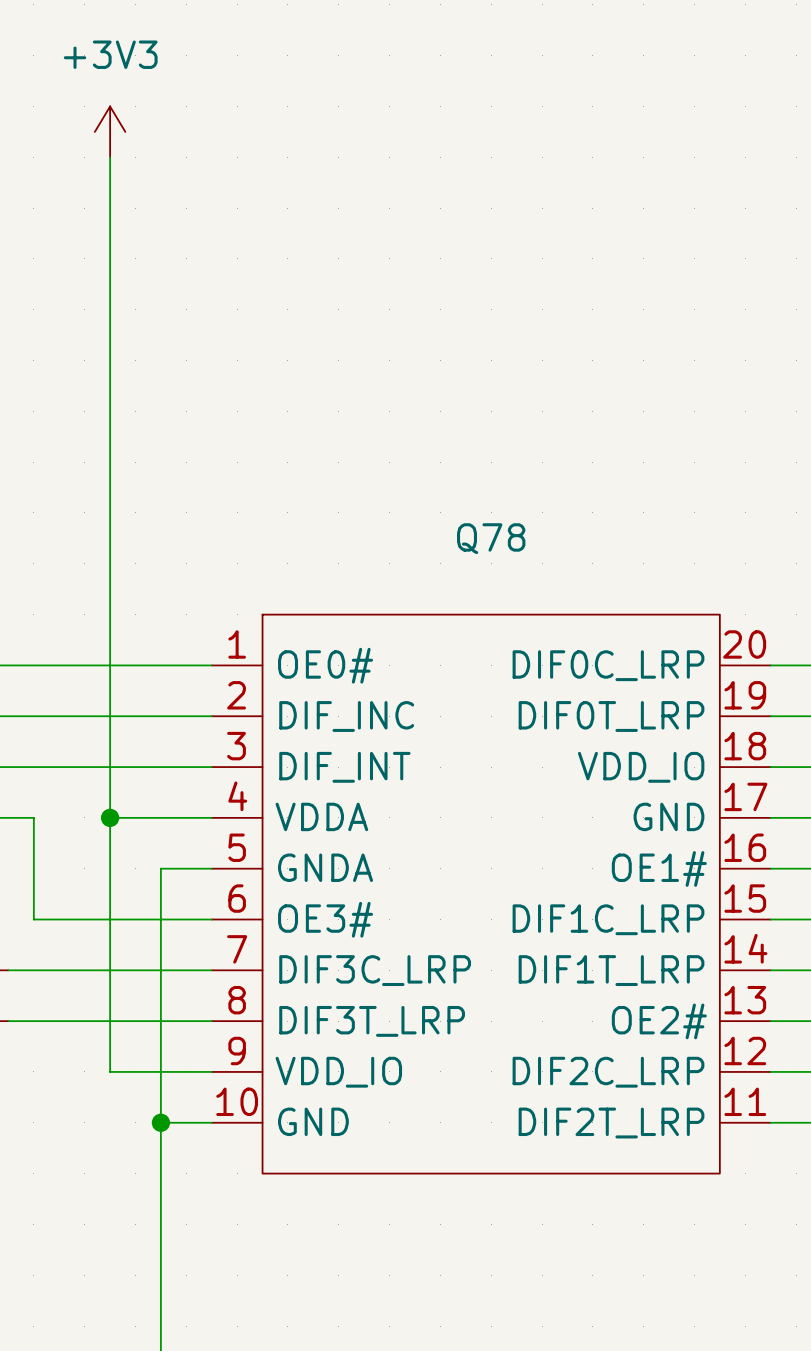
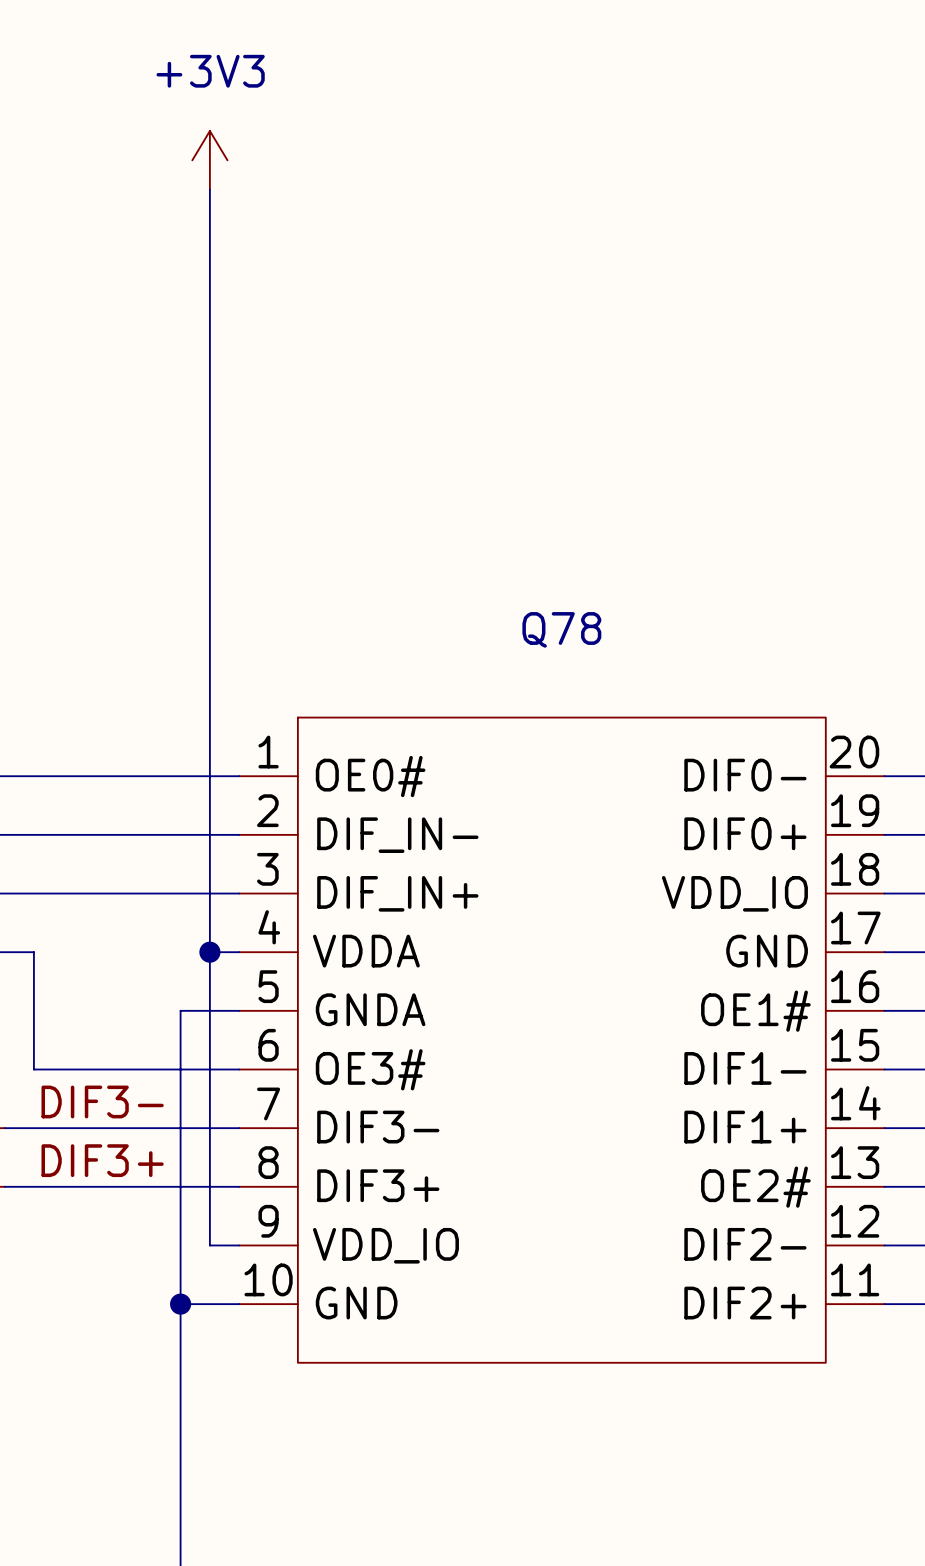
power symbol position: +3V3 (110, 131) -> +3V3 (209, 160)
wire: (110, 157) (110, 1071) (186, 1071) -> (209, 189) (209, 1245)
Q78 symbol: [211, 614, 771, 1174] -> [239, 717, 885, 1363]
wire: (110, 817) (186, 817) -> none
junction position: (110, 817) -> (209, 952)
label: none -> DIF3- (102, 1101)
label: none -> DIF3+ (102, 1160)

